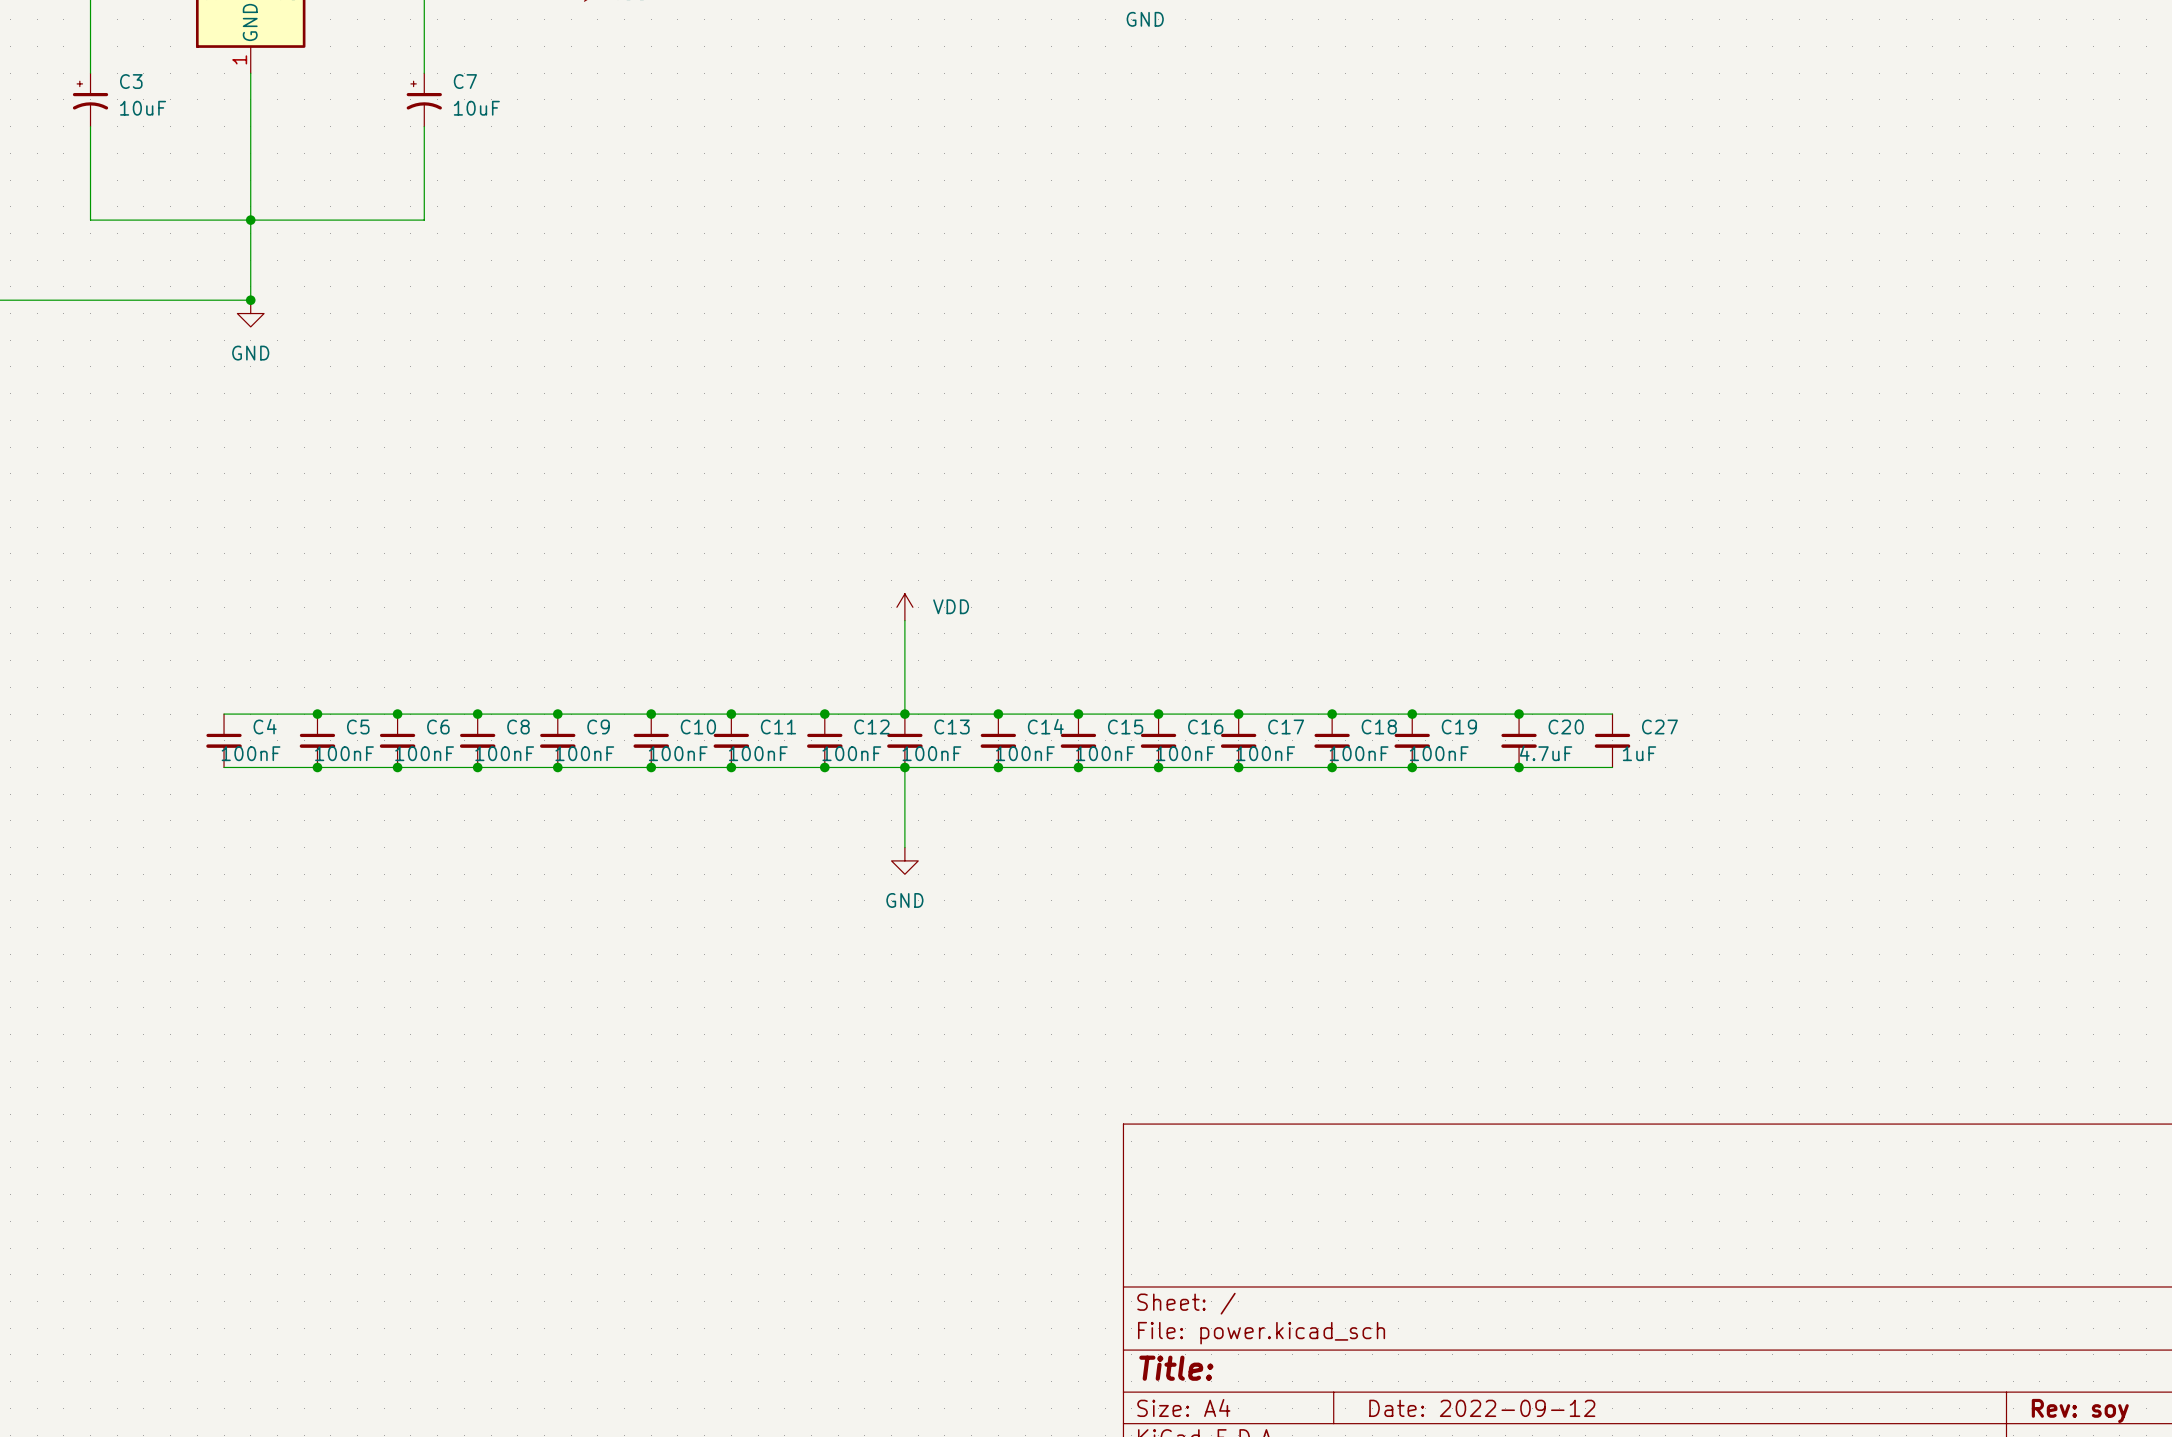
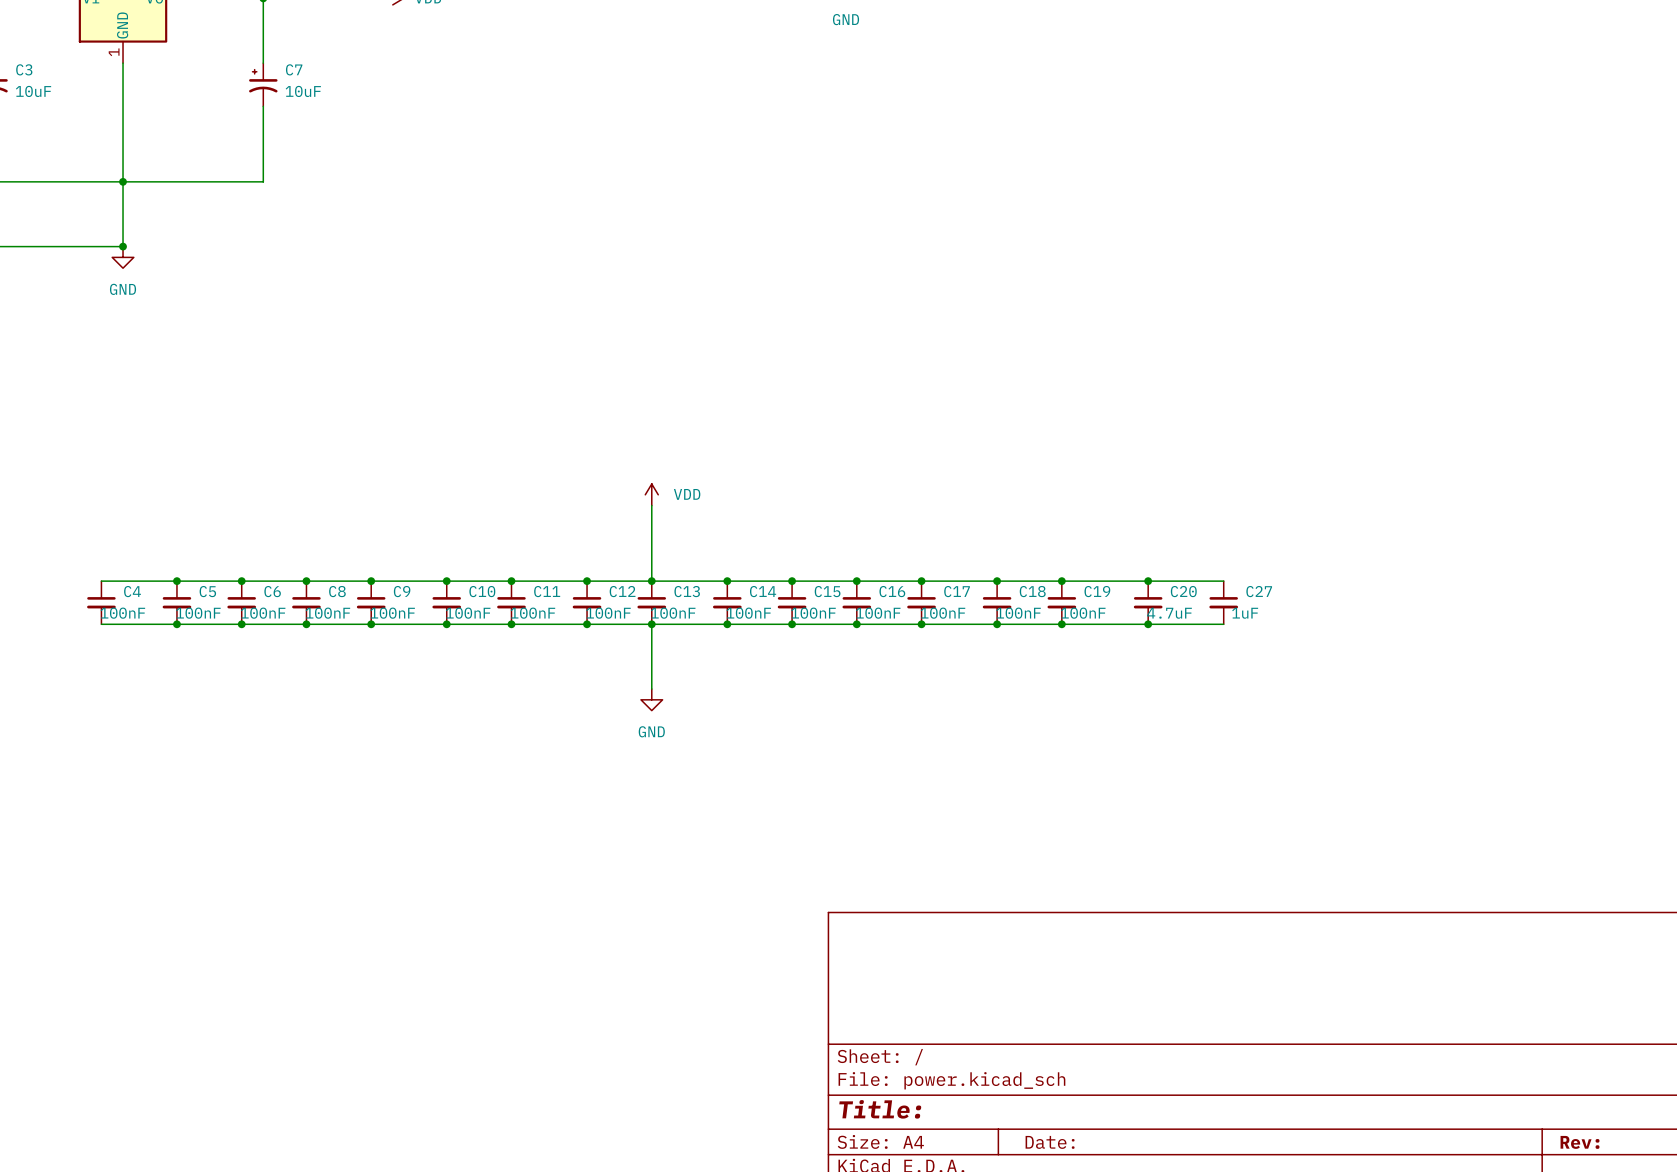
title block: Date: 2022-09-12 (1482, 1408) -> Date: (1050, 1142)
title block: Rev: soy (2080, 1410) -> Rev: (1579, 1142)

